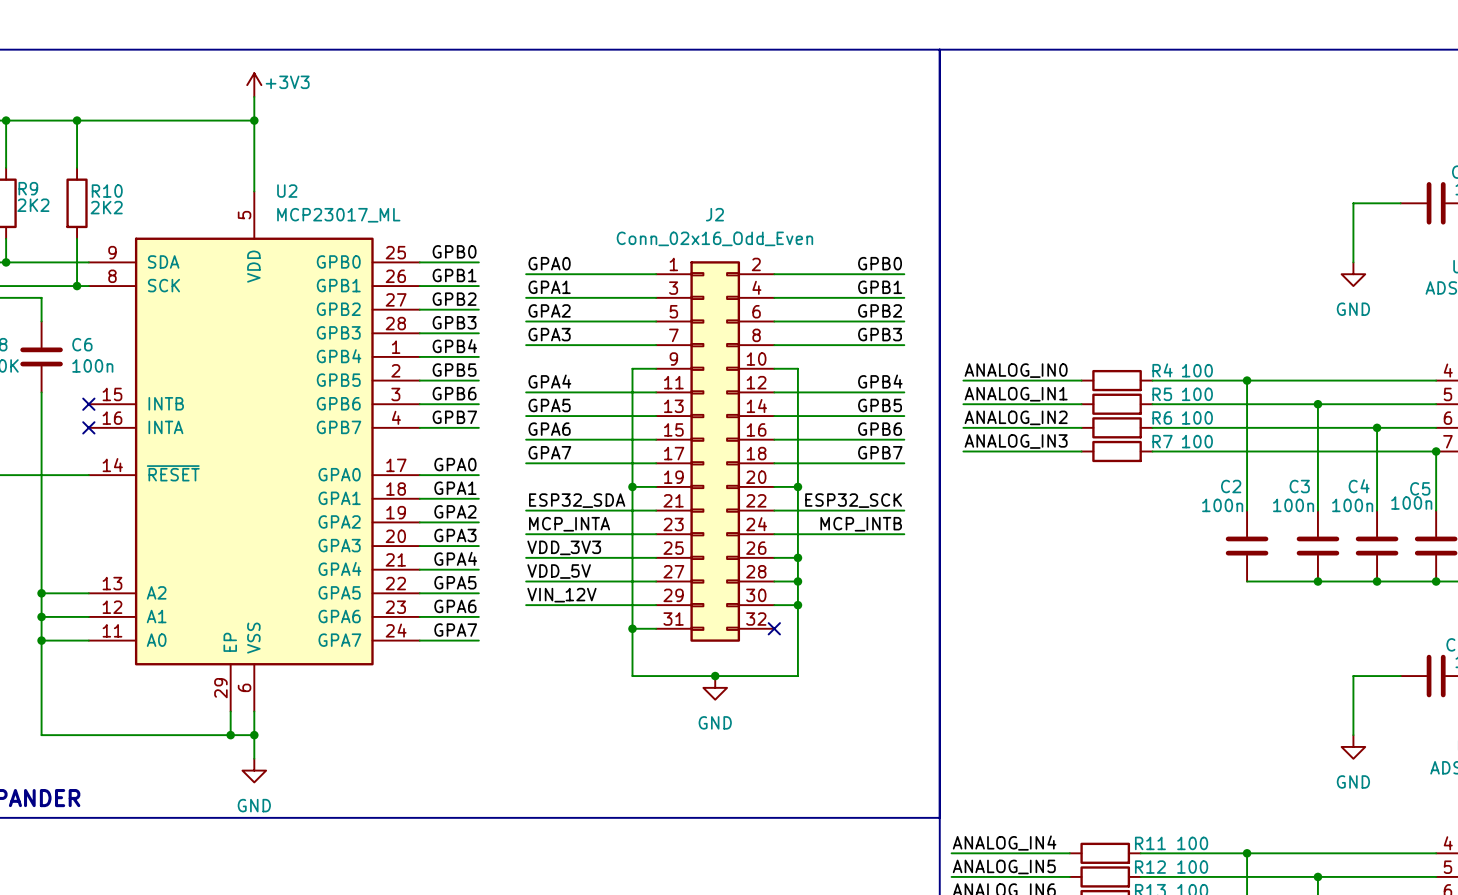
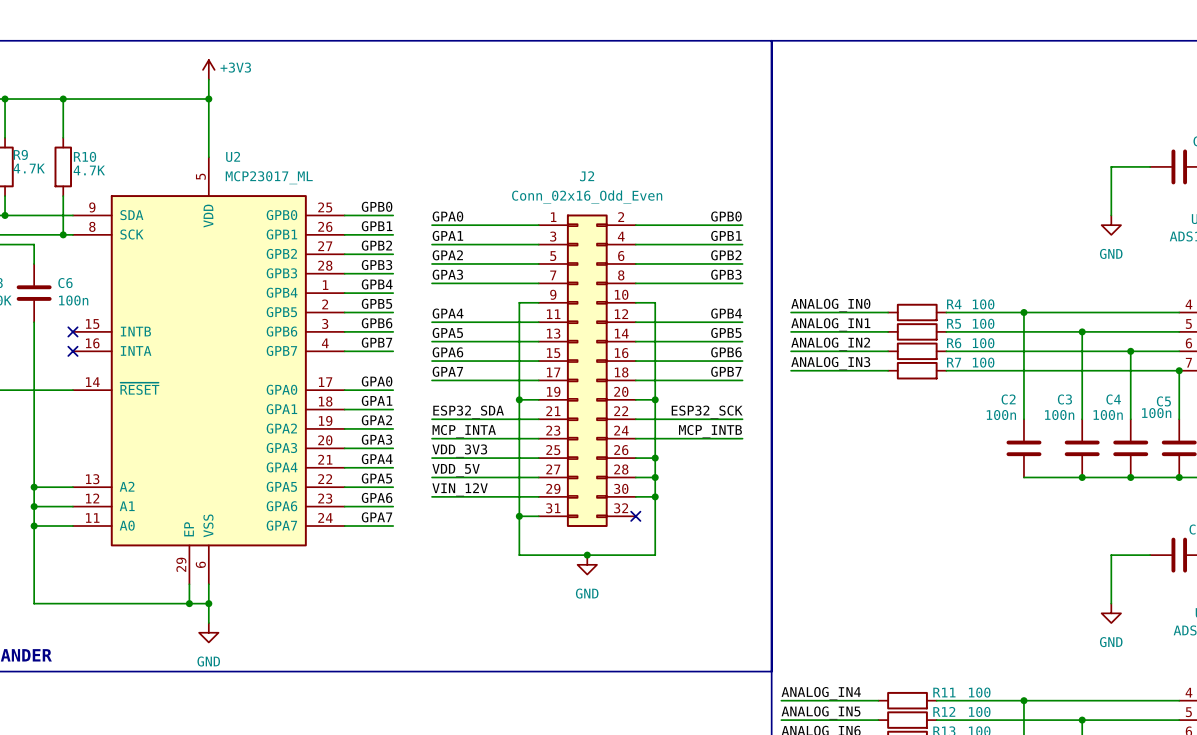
R9 value: 2K2 (33, 205) -> 4.7K (29, 168)
R10 value: 2K2 (106, 207) -> 4.7K (89, 170)

